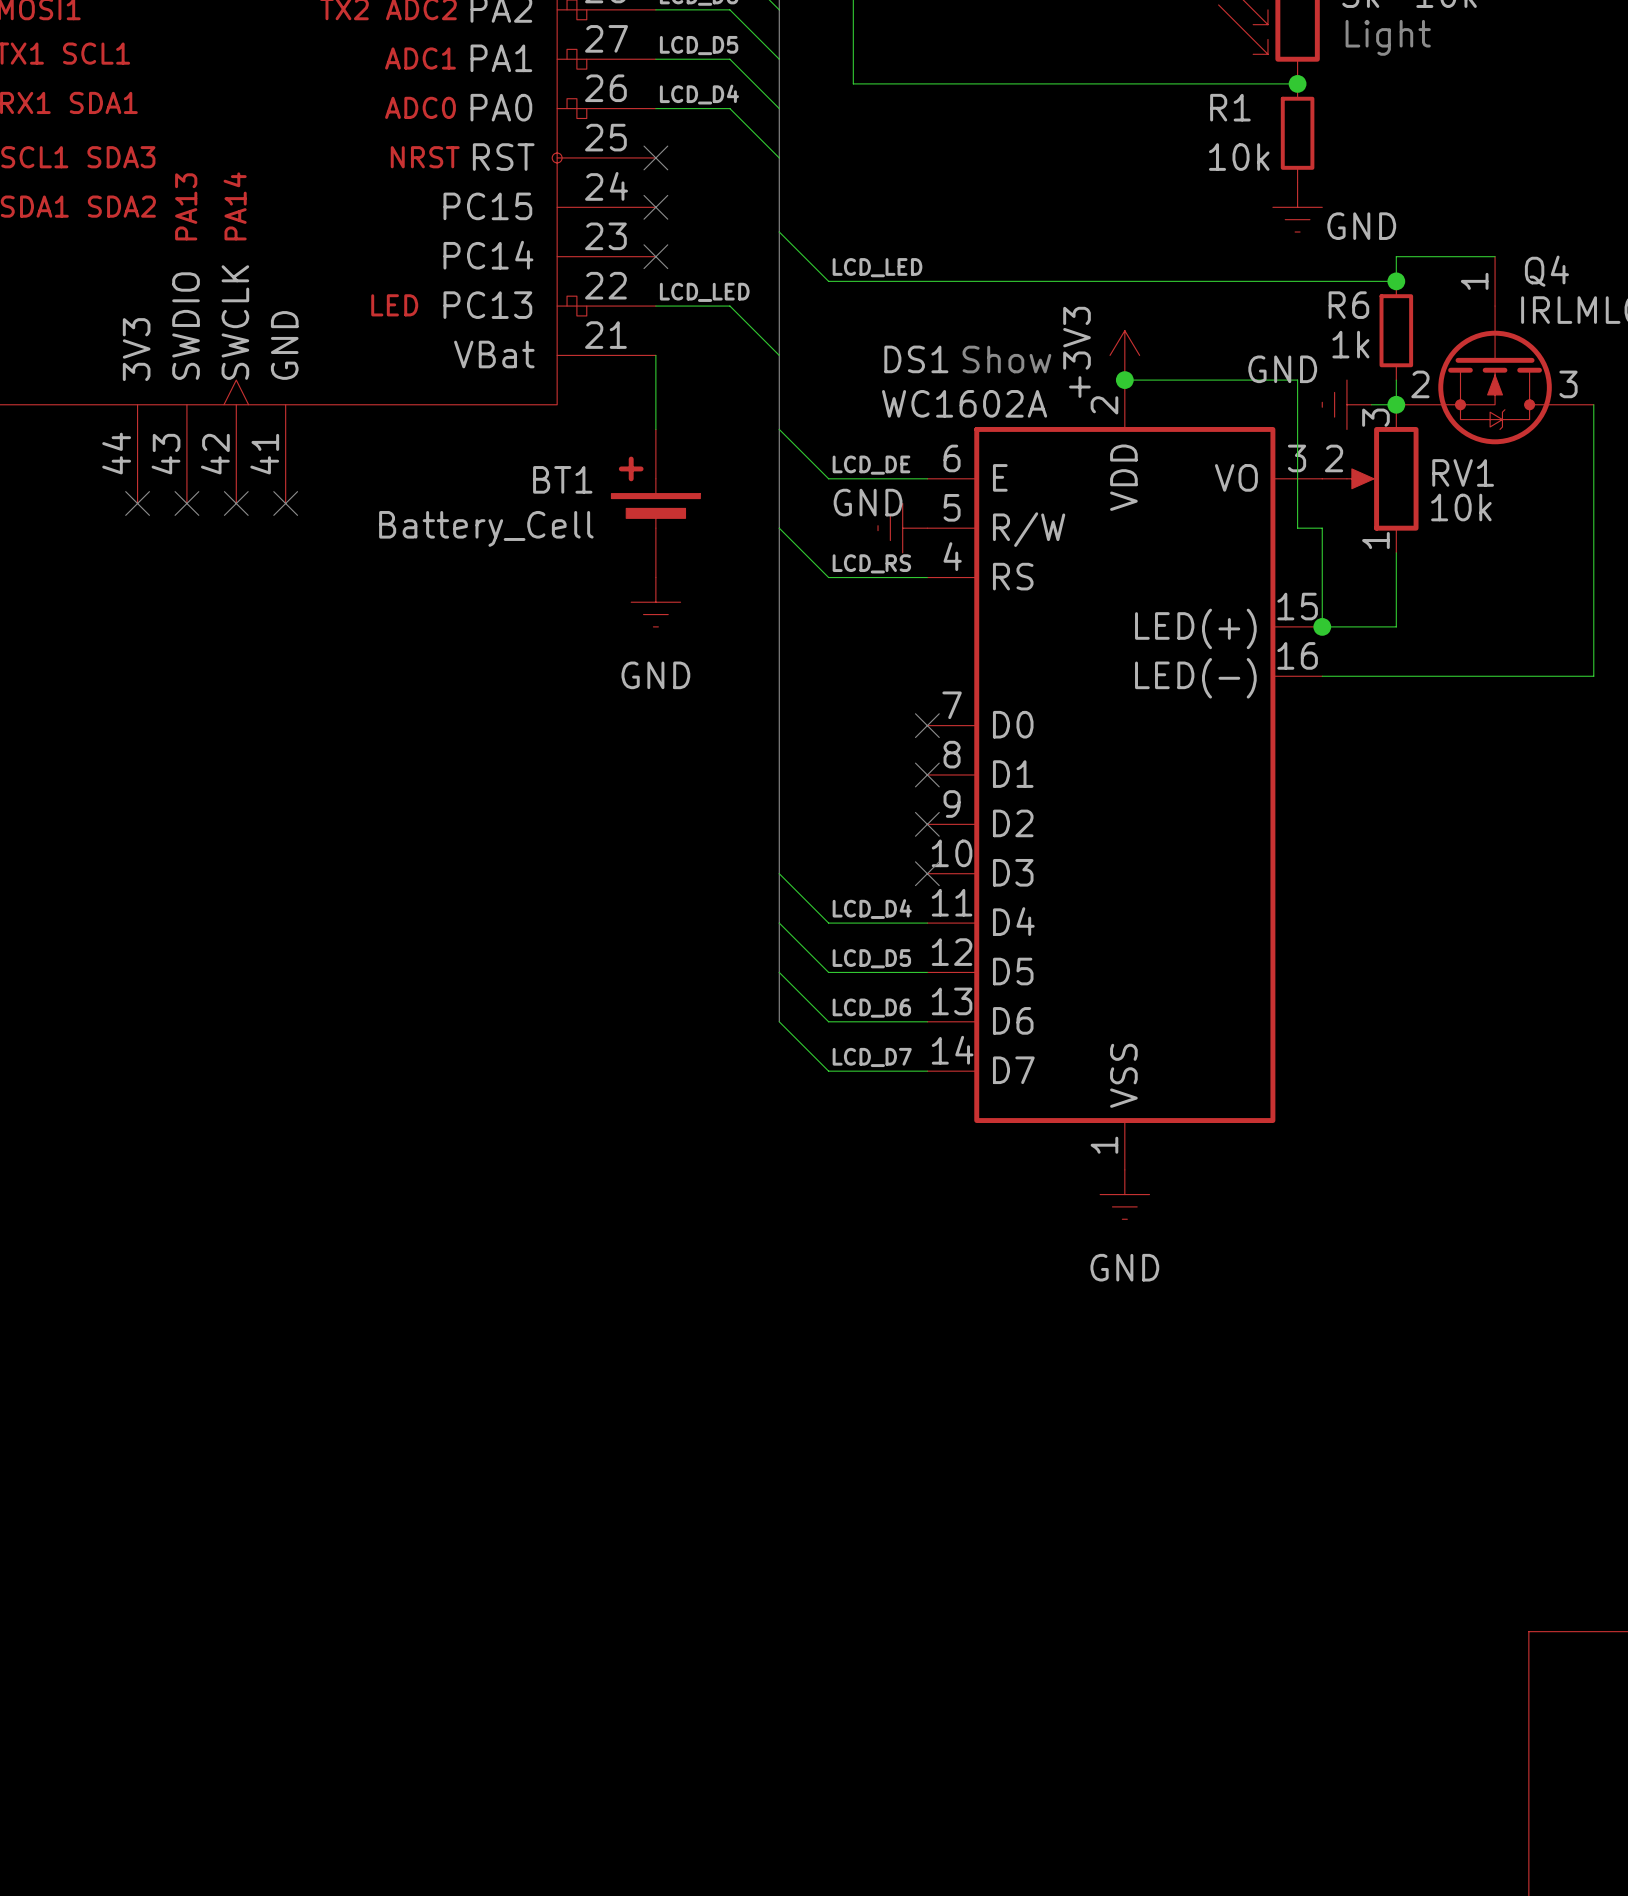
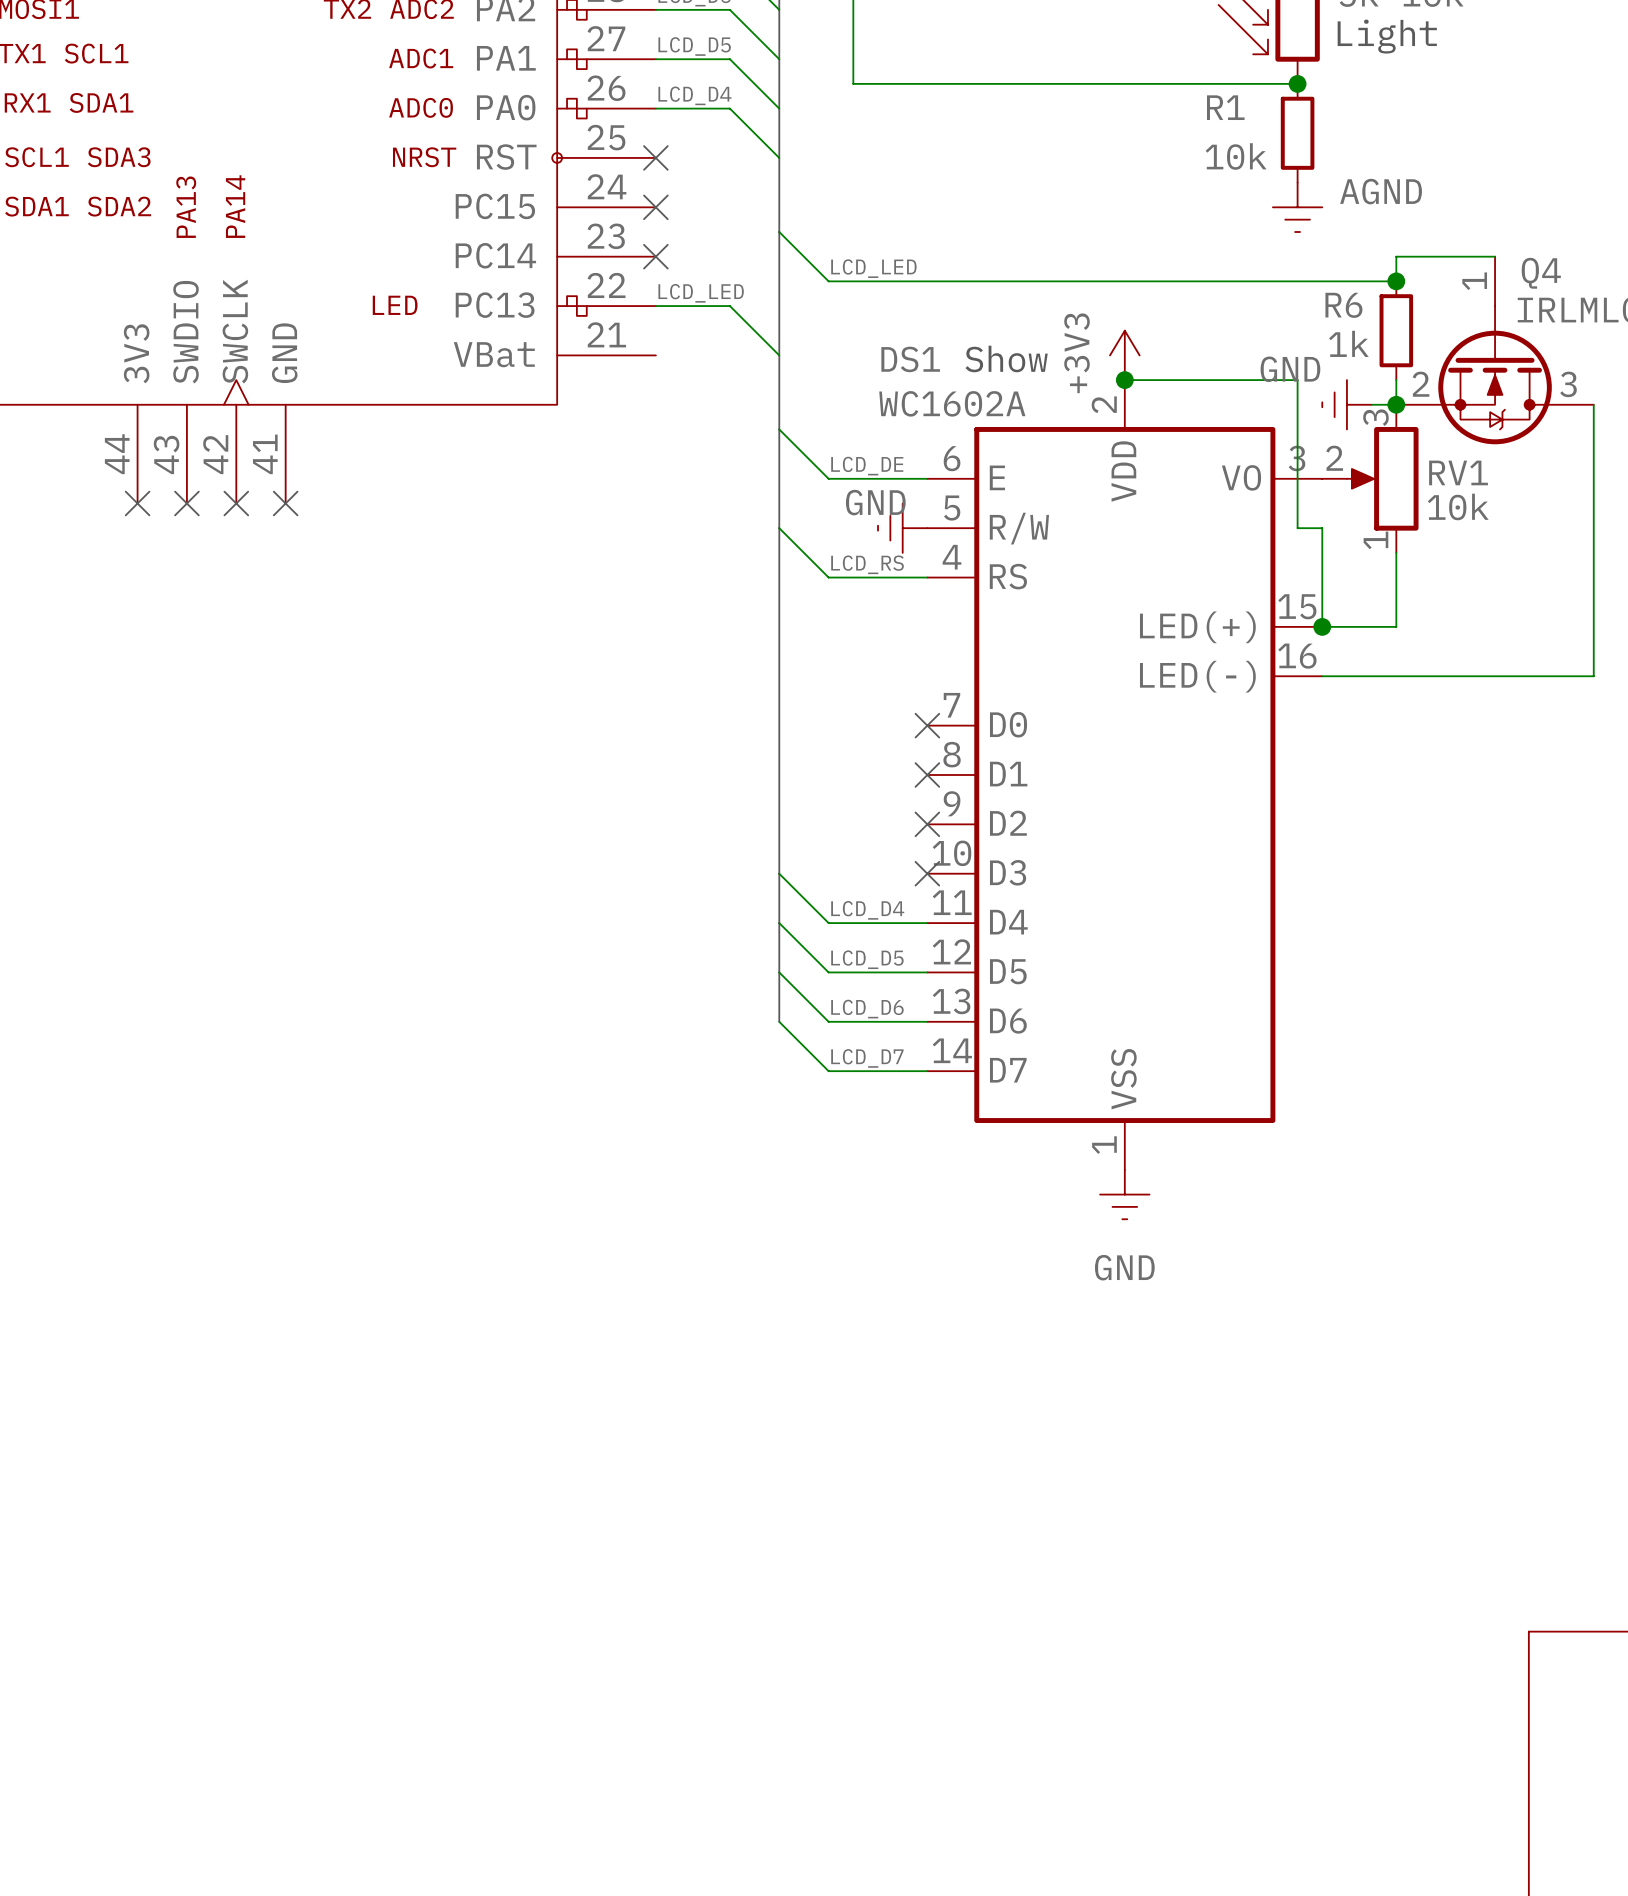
power symbol: GND (1297, 207) -> AGND (1297, 207)
wire: (655, 355) (655, 429) -> none
BT1: Battery_Cell (655, 503) -> none
power symbol: GND (655, 602) -> none

